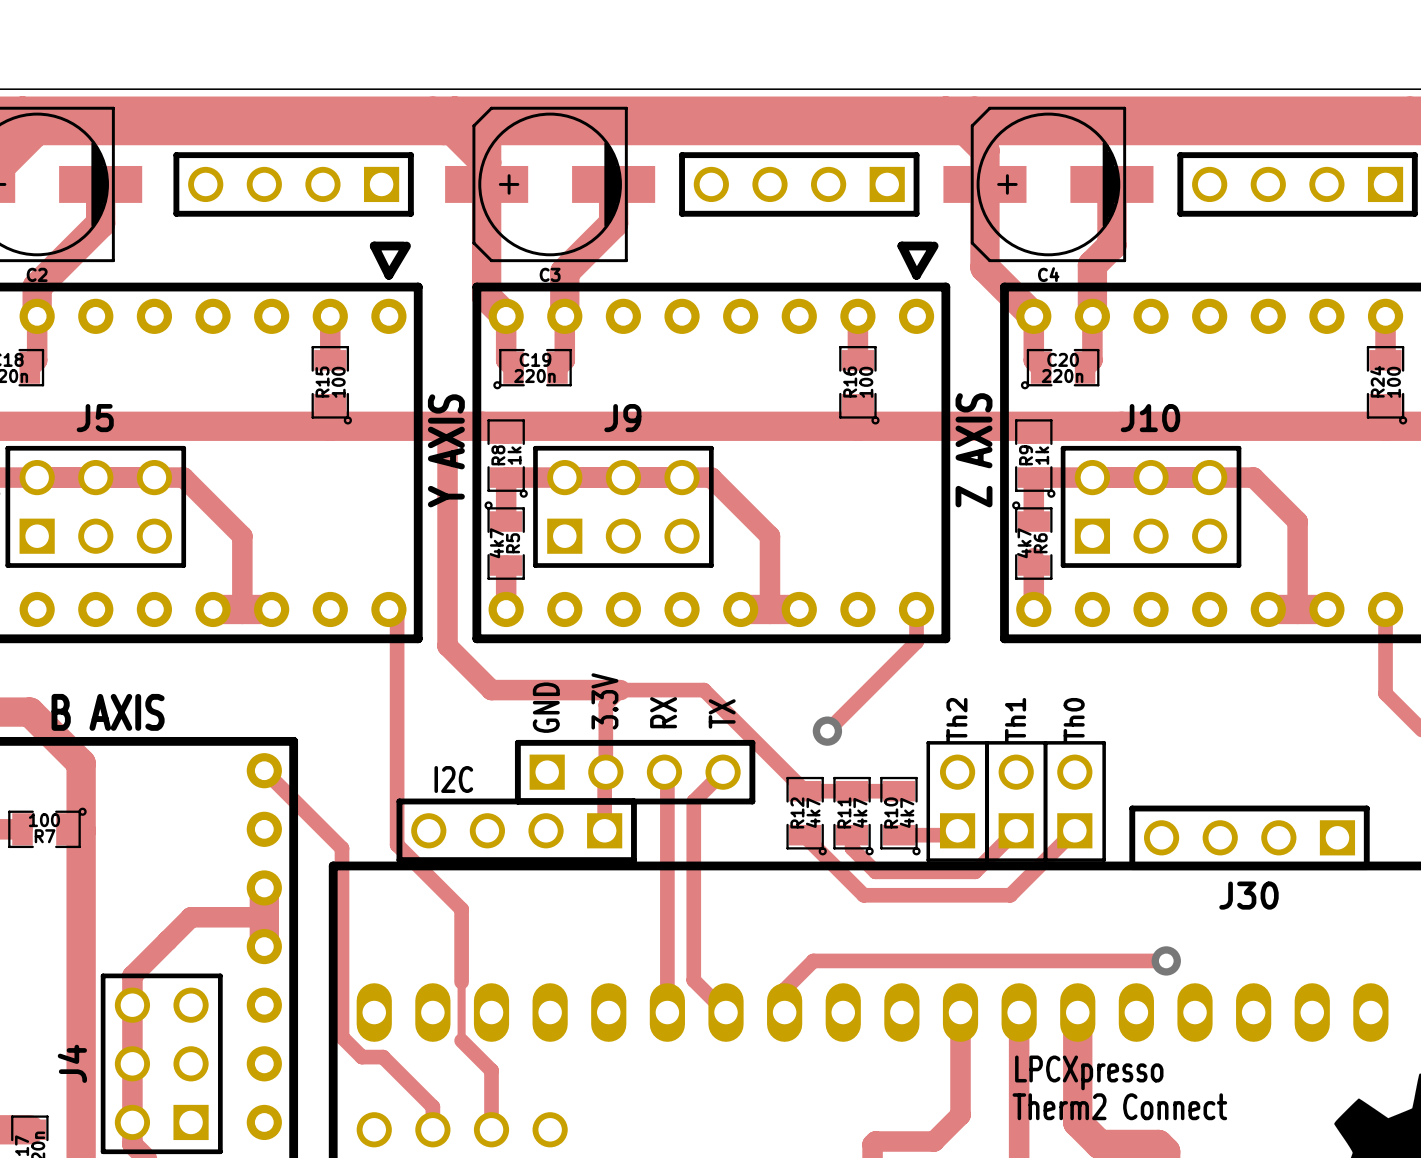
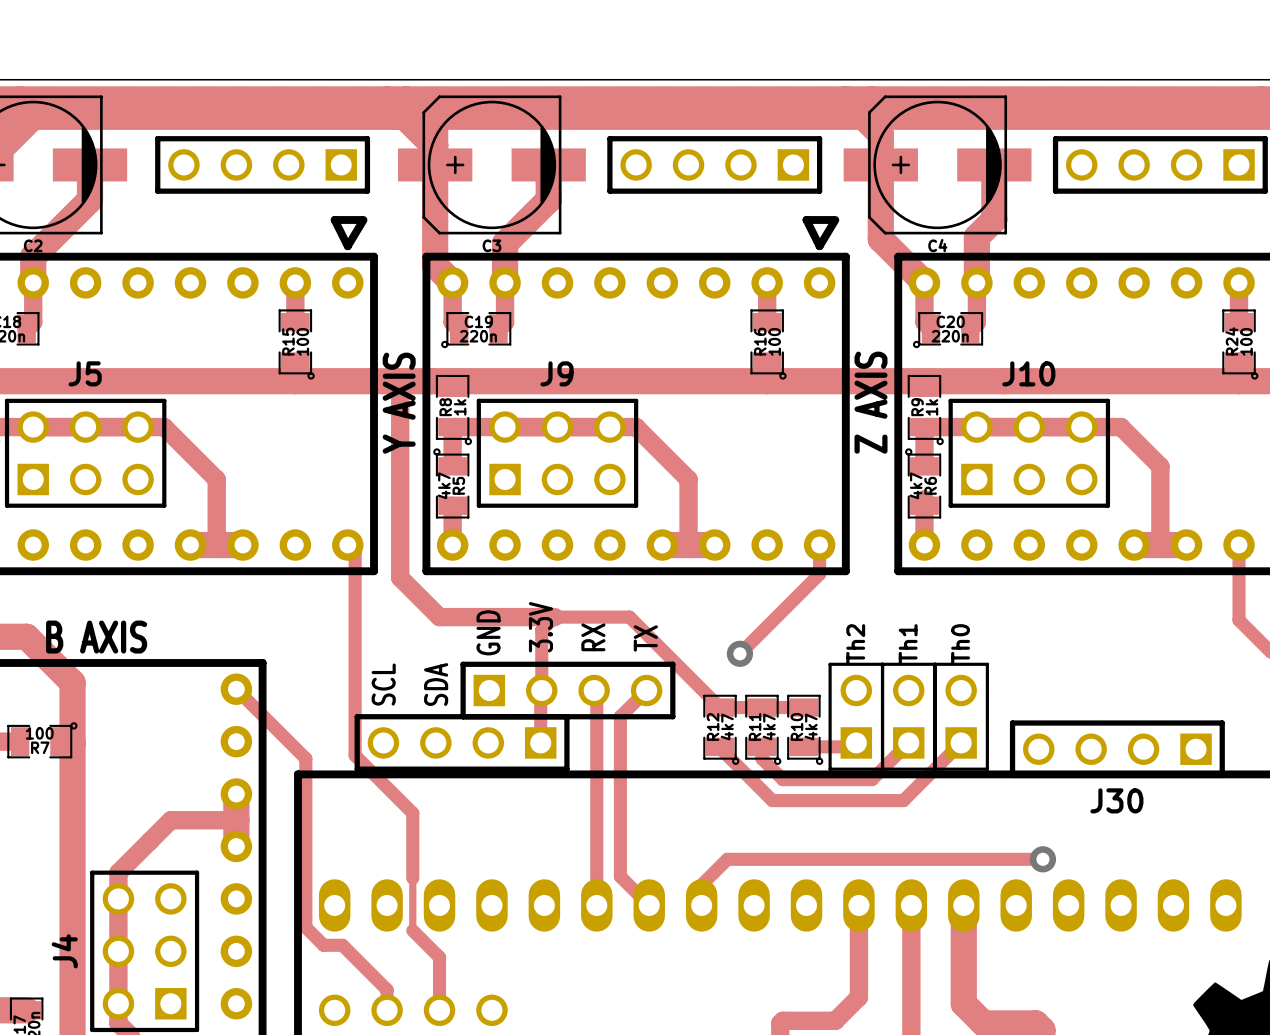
text: none -> SCL (383, 684)
text: none -> SDA (436, 684)
text: I2C (453, 779) -> none
text: LPCXpresso (1089, 1072) -> none
text: Therm2 Connect (1119, 1106) -> none

